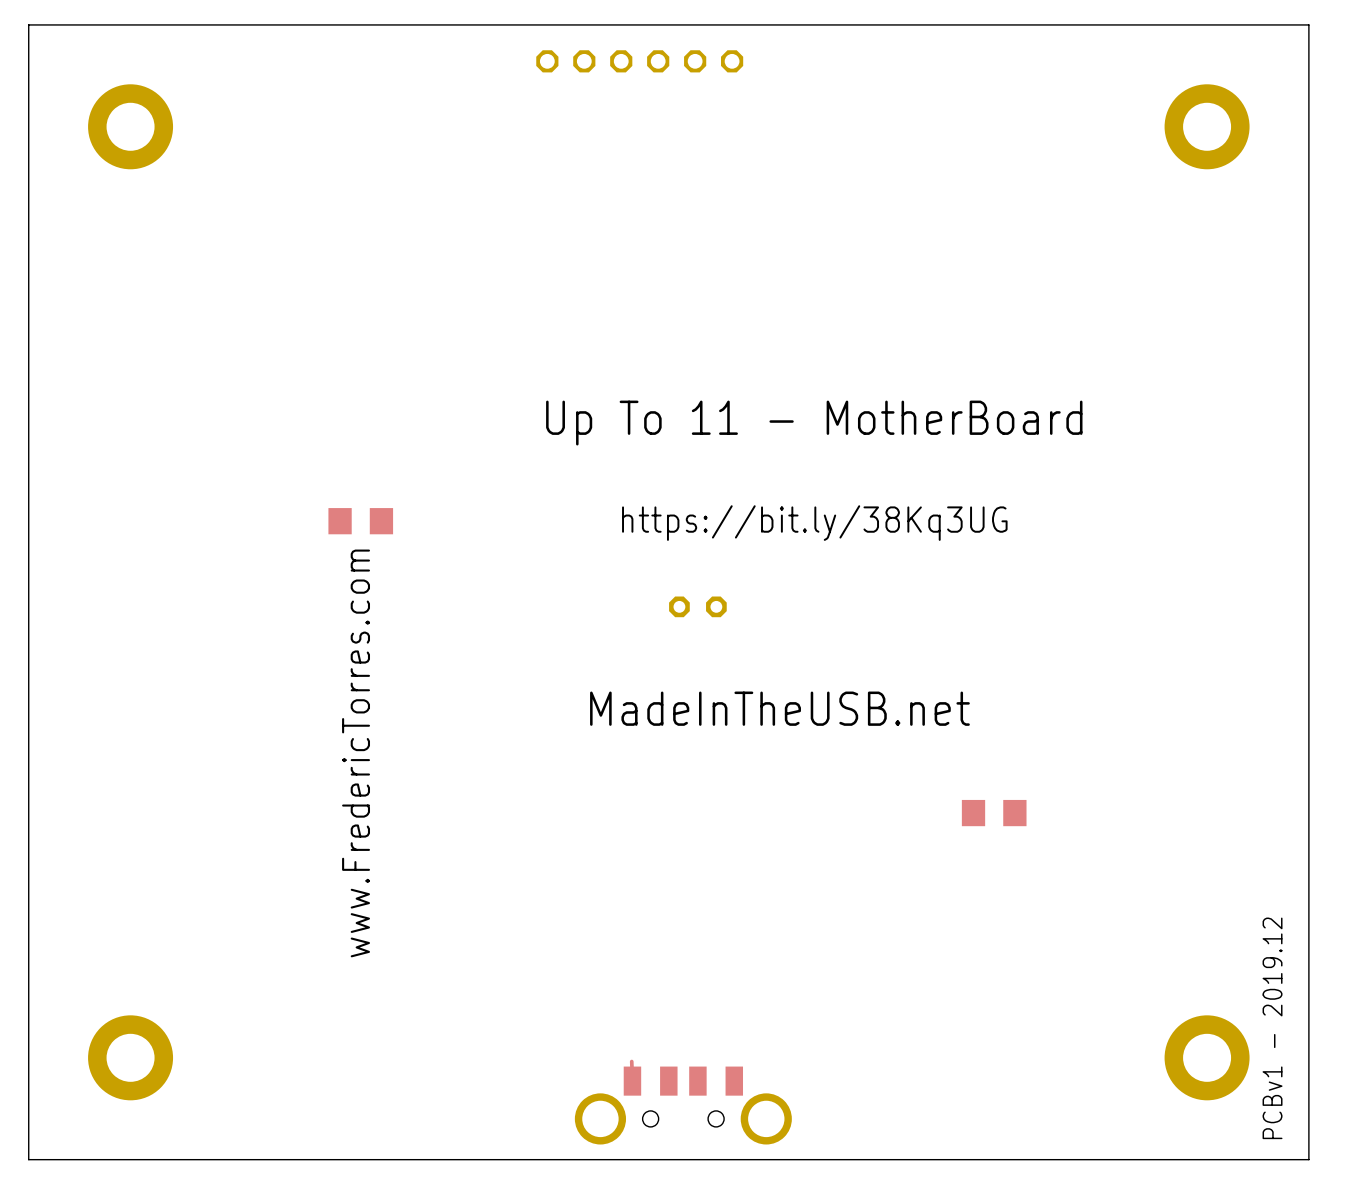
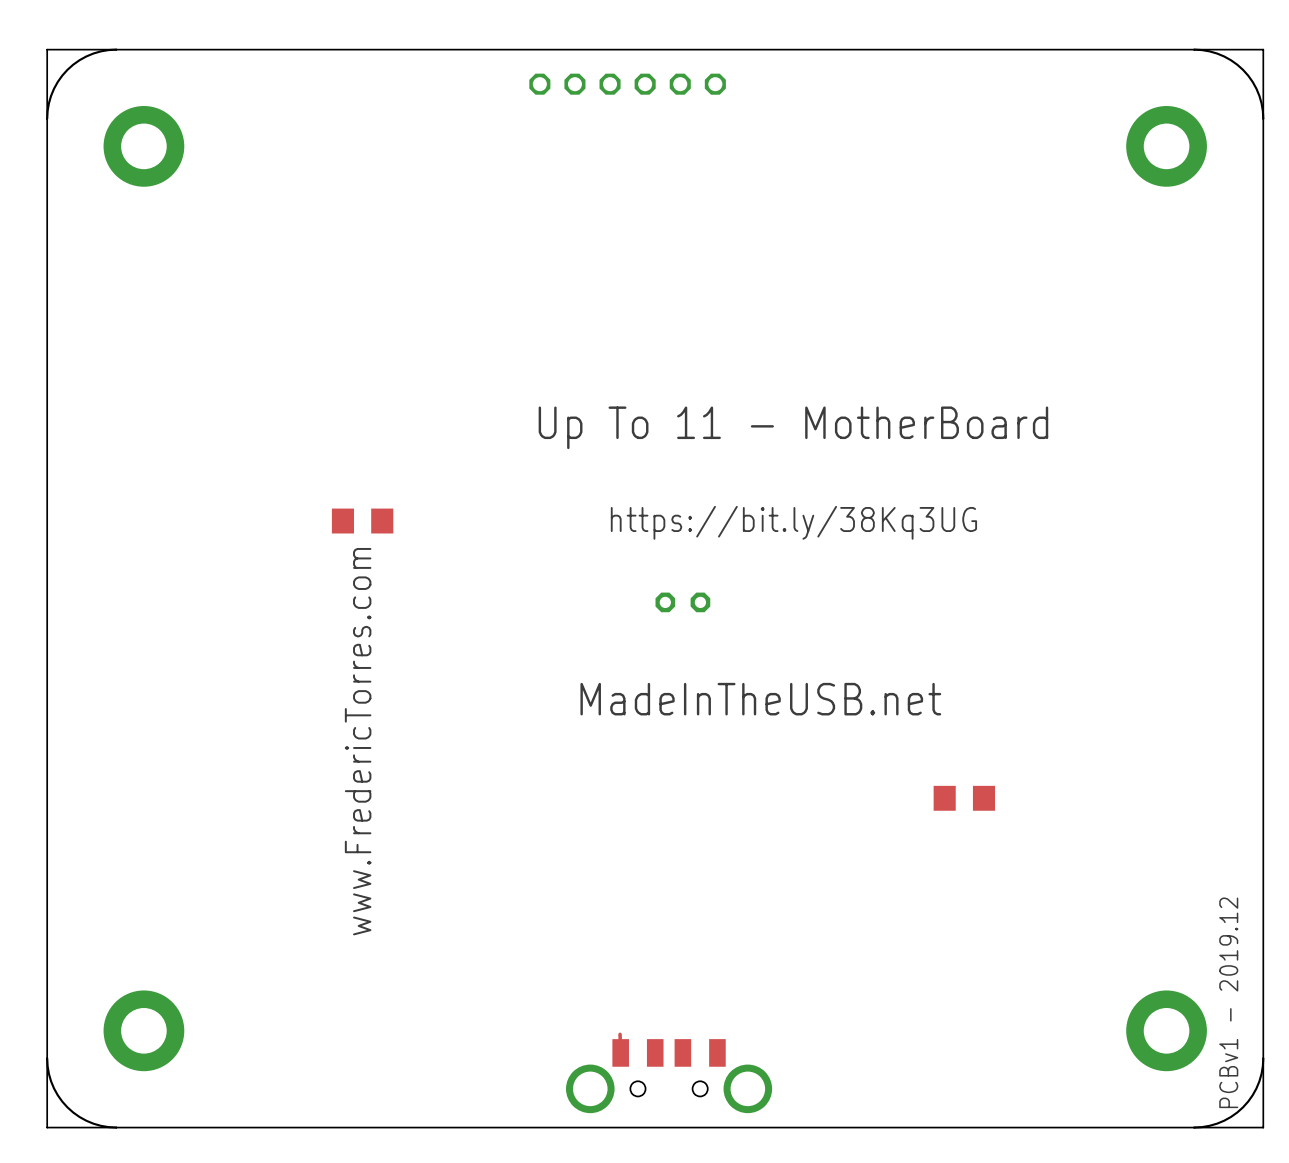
board edge: none -> (116, 49) (93, 53) (79, 60) (67, 69) (57, 81) (51, 95) (47, 118)
board edge: none -> (1194, 49) (1217, 53) (1230, 60) (1243, 69) (1252, 81) (1259, 95) (1263, 118)
board edge: none -> (47, 1058) (51, 1081) (57, 1095) (67, 1107) (79, 1116) (93, 1123) (116, 1127)
board edge: none -> (1263, 1058) (1259, 1081) (1252, 1095) (1243, 1107) (1230, 1116) (1217, 1123) (1194, 1127)

